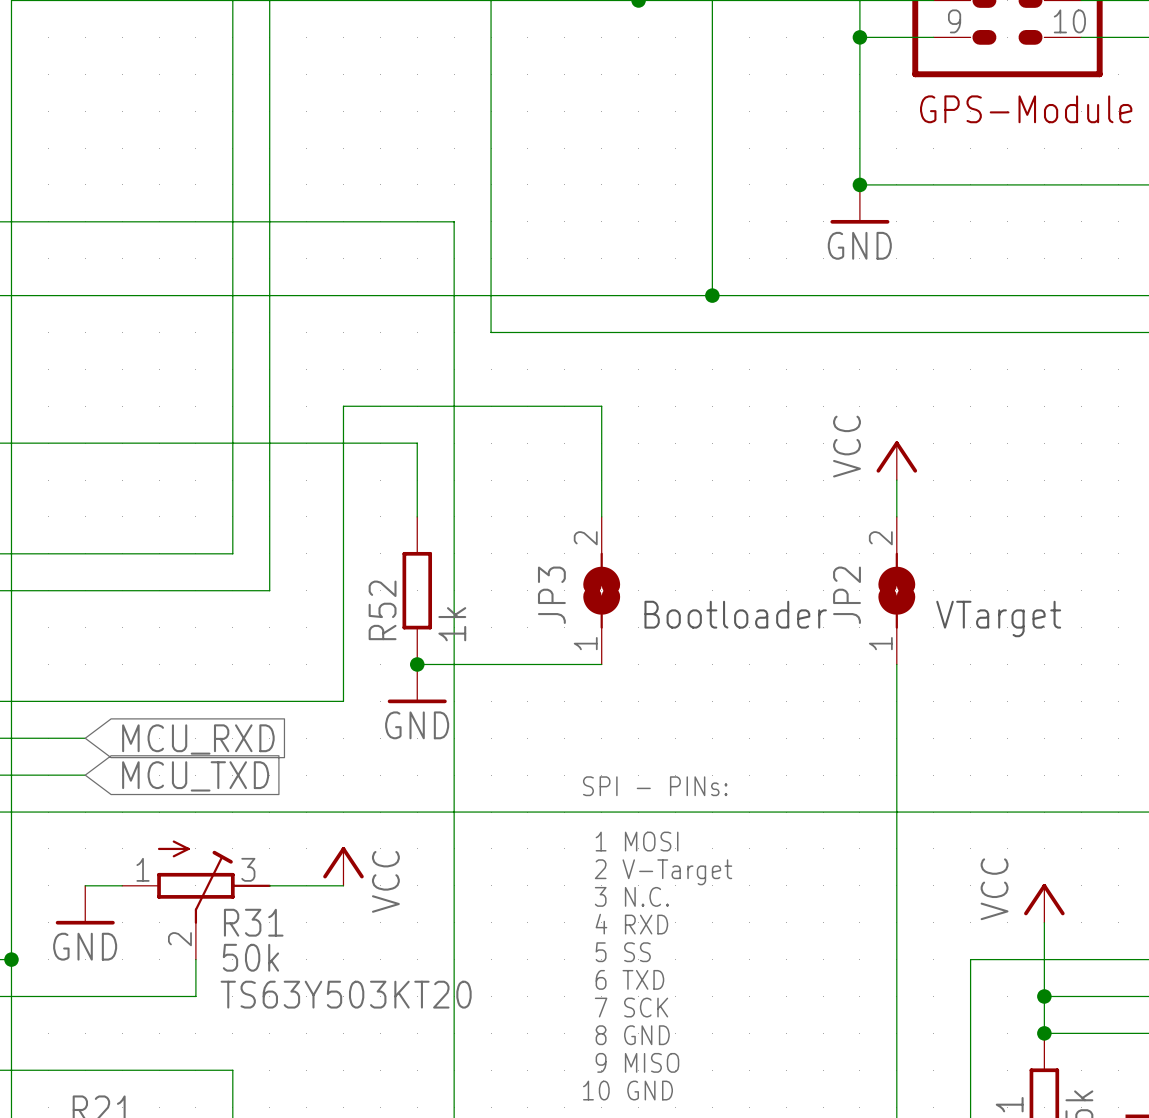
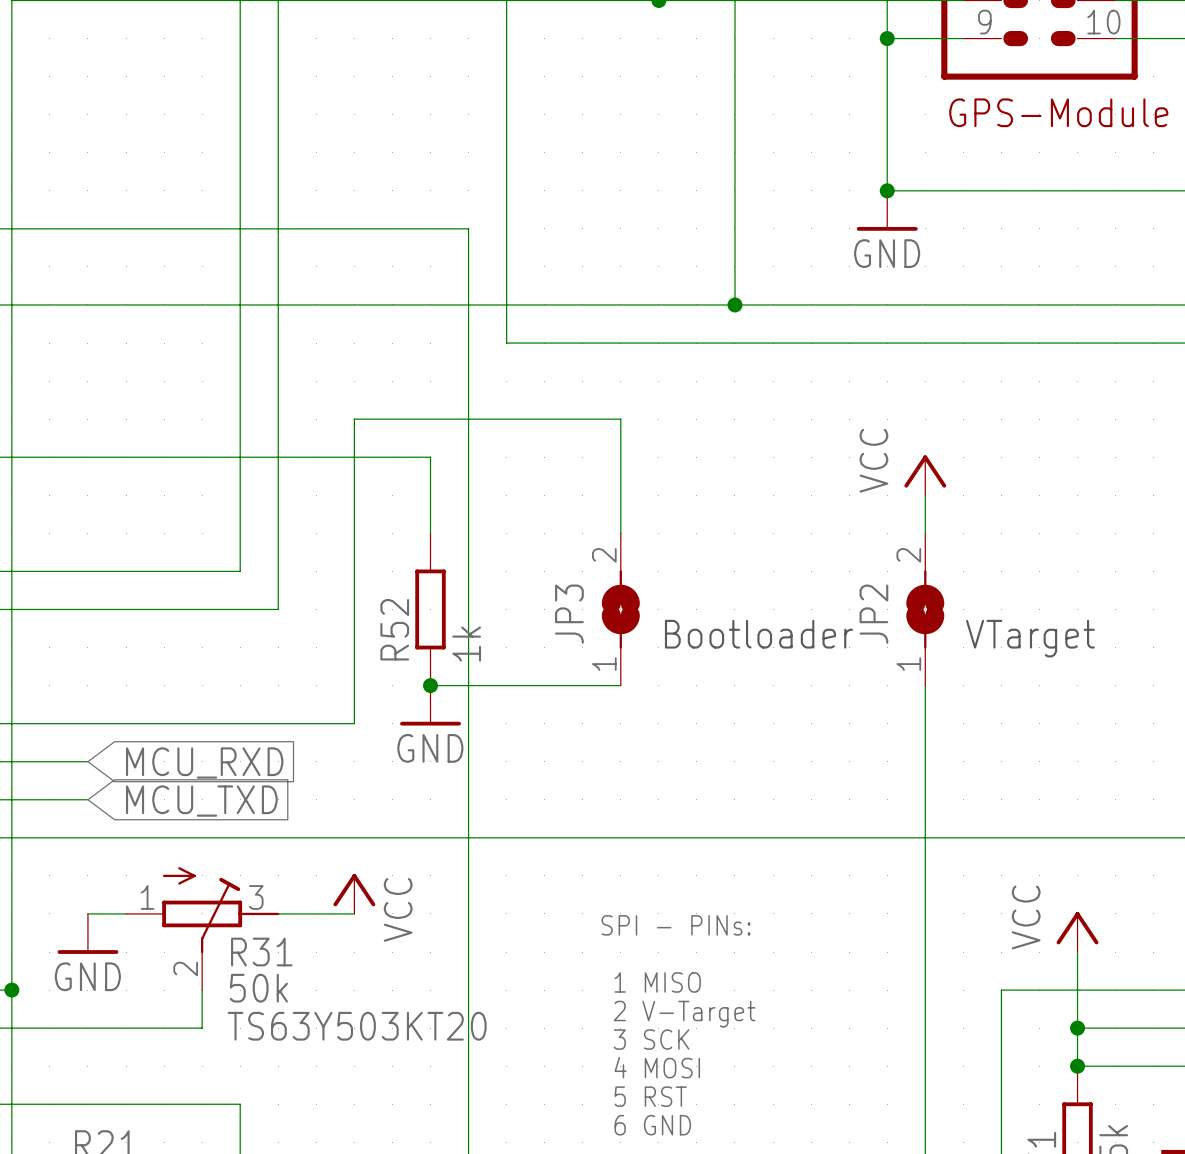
text: SPI - PINs: (655, 786) -> none
text: 1 MOSI (637, 841) -> none
text: 2 V-Target (663, 872) -> none
text: 3 N.C. (631, 896) -> SPI - PINs: (676, 925)
text: 4 RXD (631, 924) -> none
text: 5 SS (623, 952) -> 1 MISO (657, 982)
text: 6 TXD (629, 979) -> 2 V-Target (684, 1014)
text: 7 SCK (631, 1007) -> 3 SCK (651, 1039)
text: 8 GND (632, 1035) -> 4 MOSI (657, 1067)
text: 9 MISO (637, 1062) -> 5 RST (650, 1096)
text: 10 GND (627, 1090) -> 6 GND (652, 1125)

